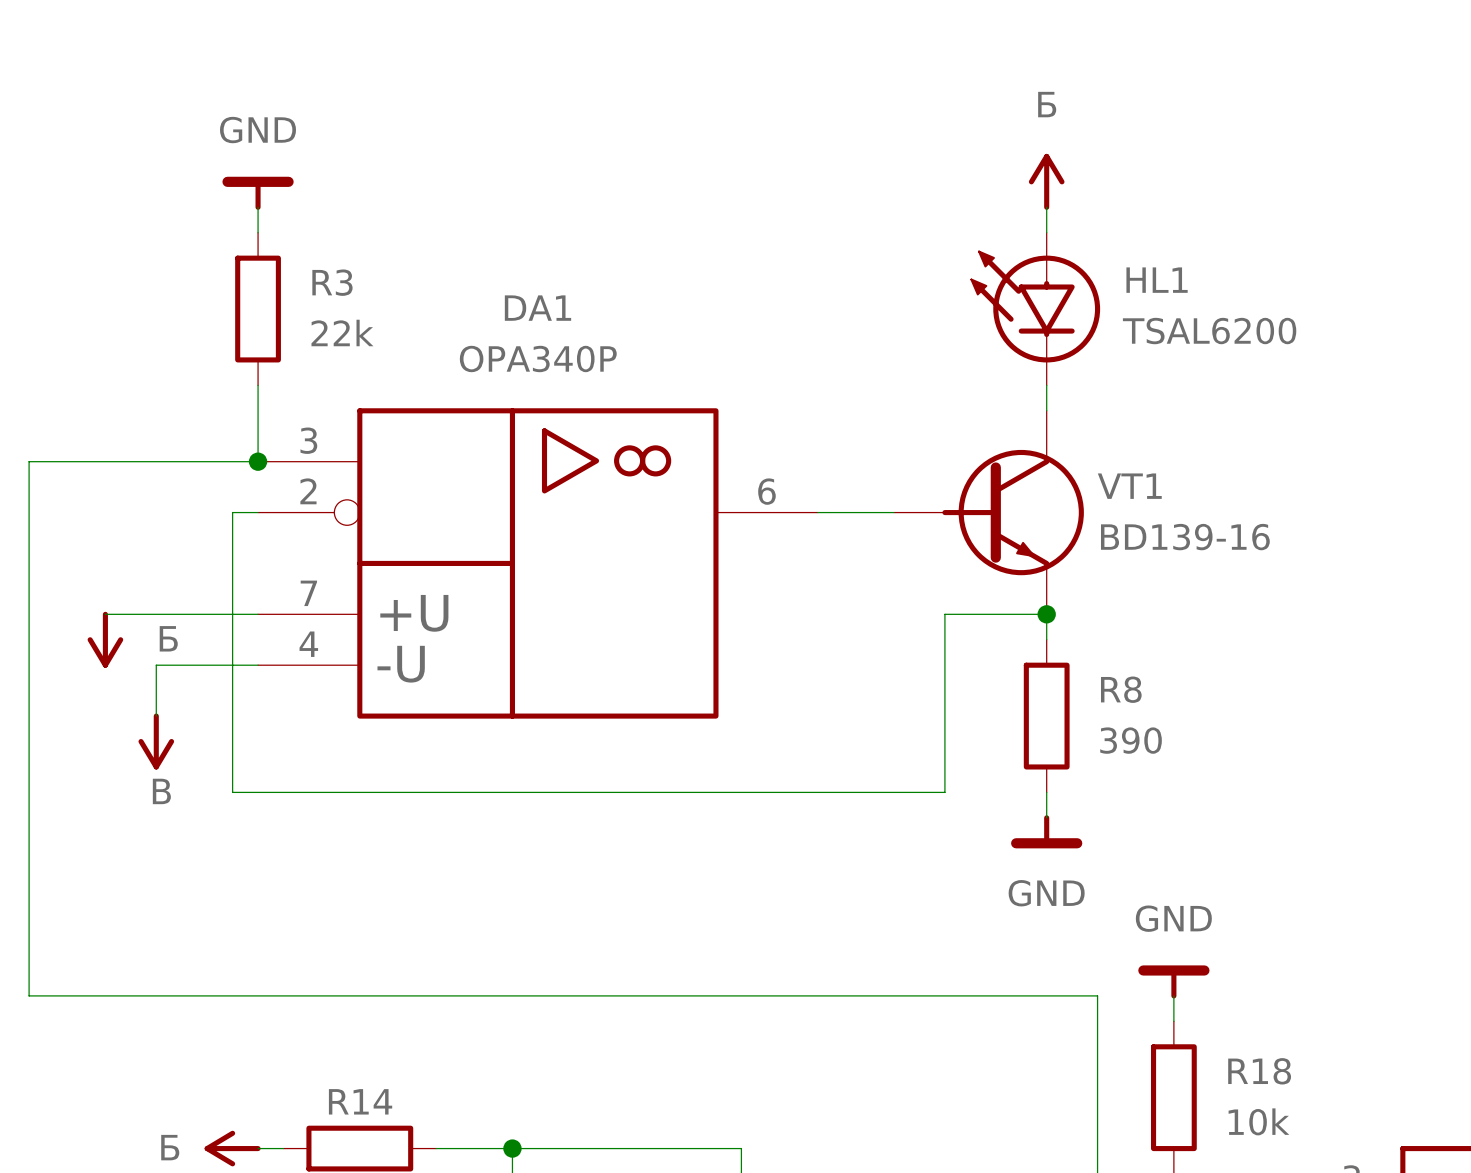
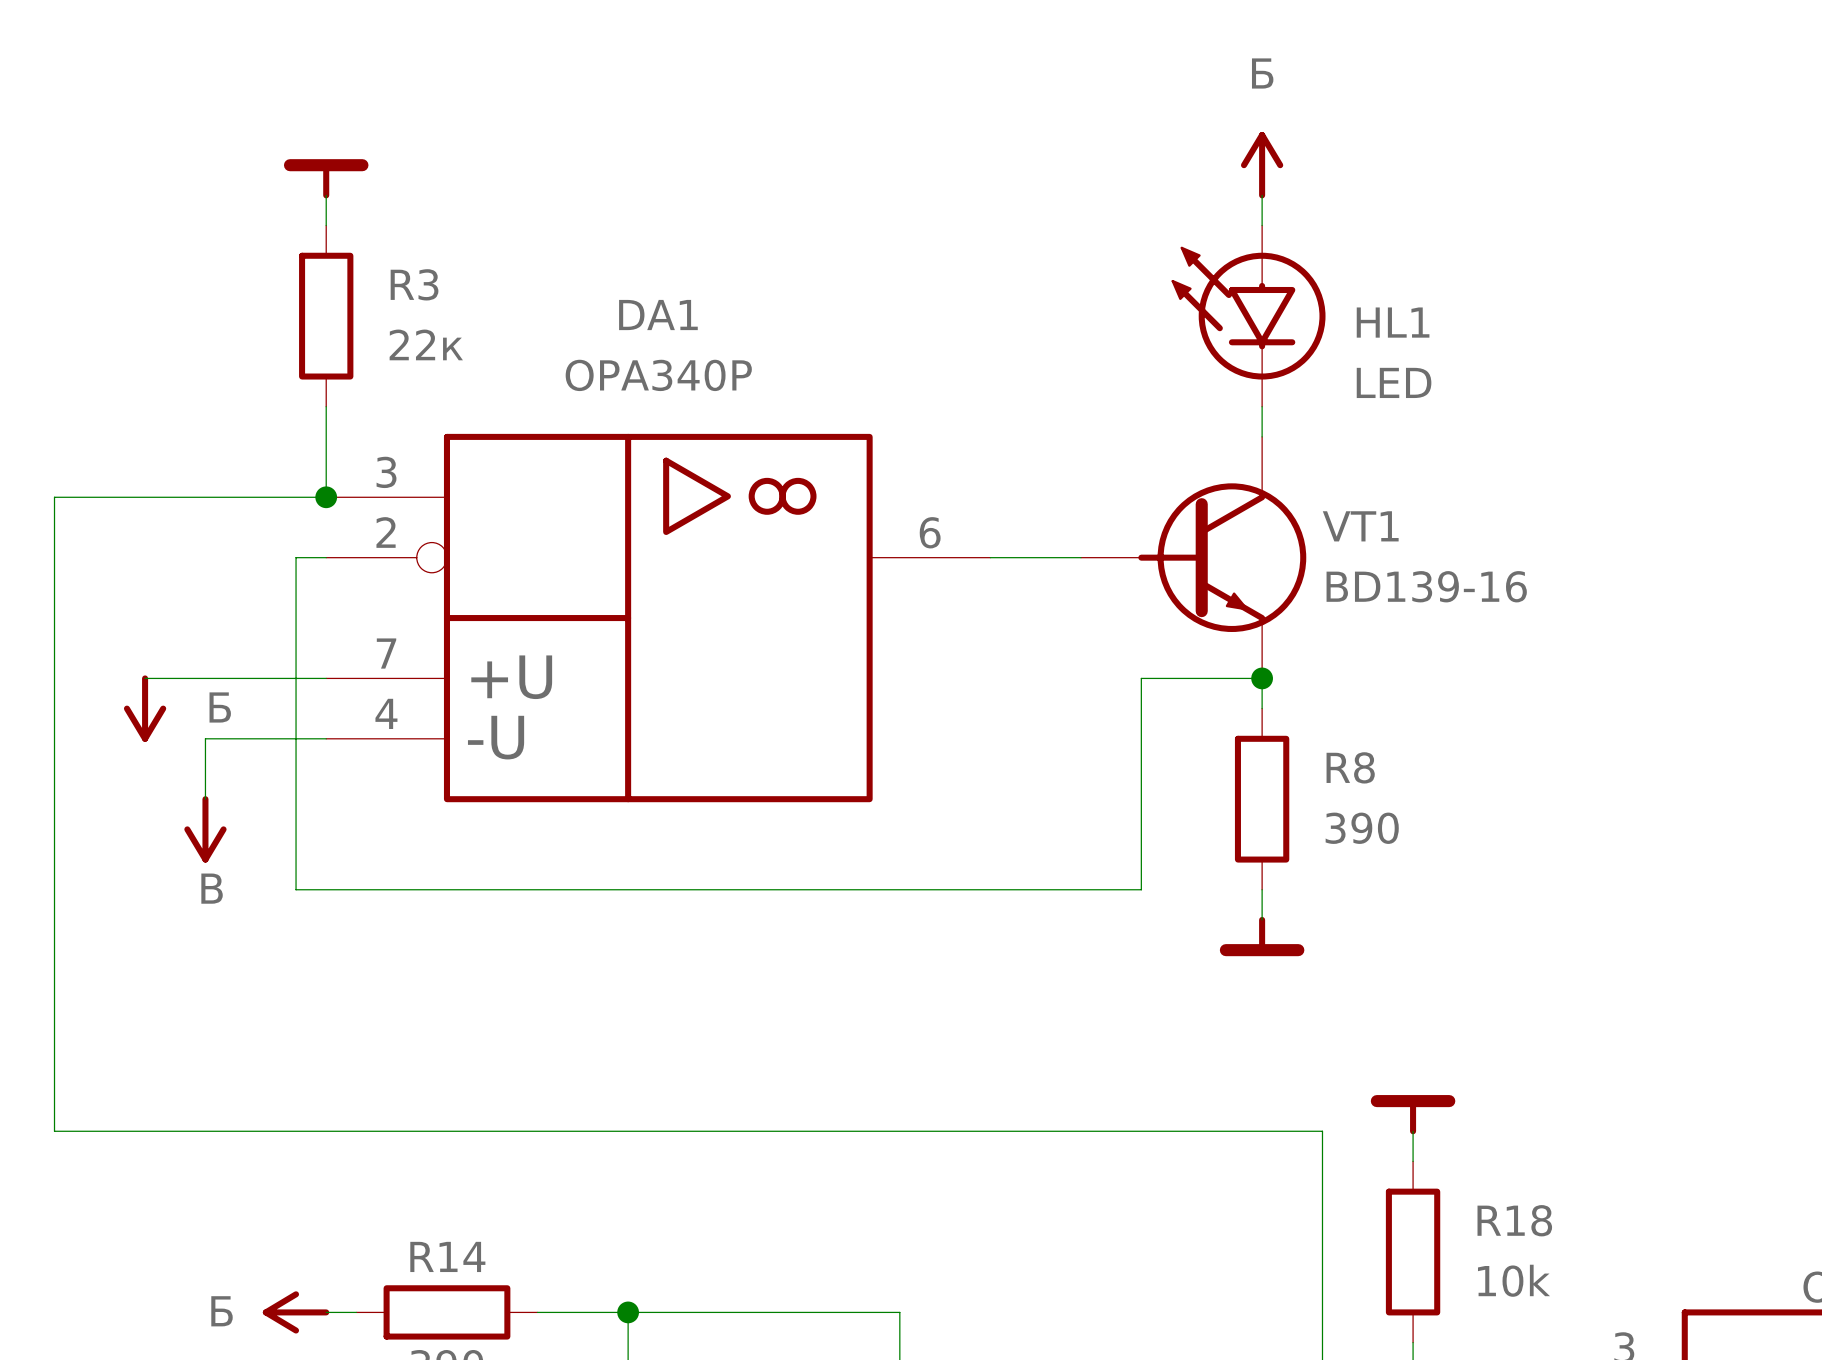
power symbol text: GND (257, 130) -> none
HL1 name position: HL1 (1157, 280) -> HL1 (1393, 322)
HL1 value: TSAL6200 (1209, 331) -> LED (1394, 382)
R3 value: 22k (342, 332) -> 22к (426, 344)
power symbol text: GND (1046, 893) -> none
power symbol text: GND (1173, 918) -> none

